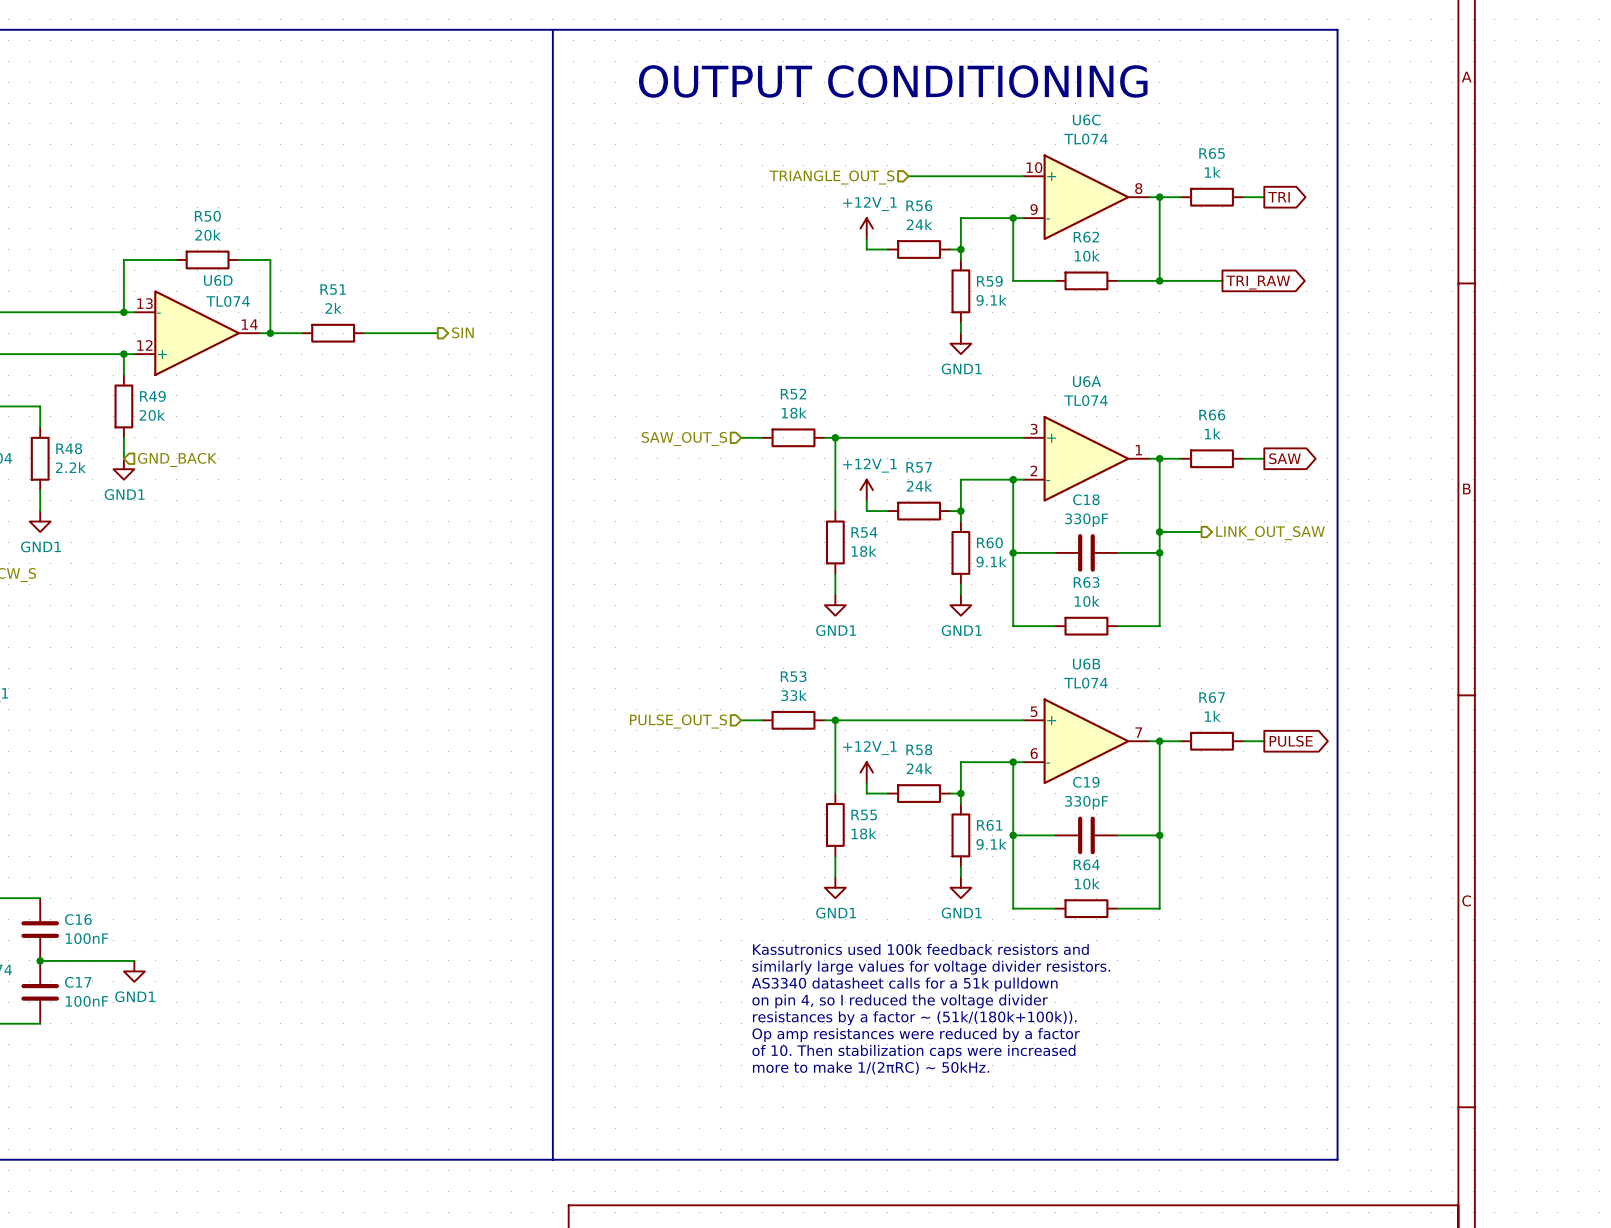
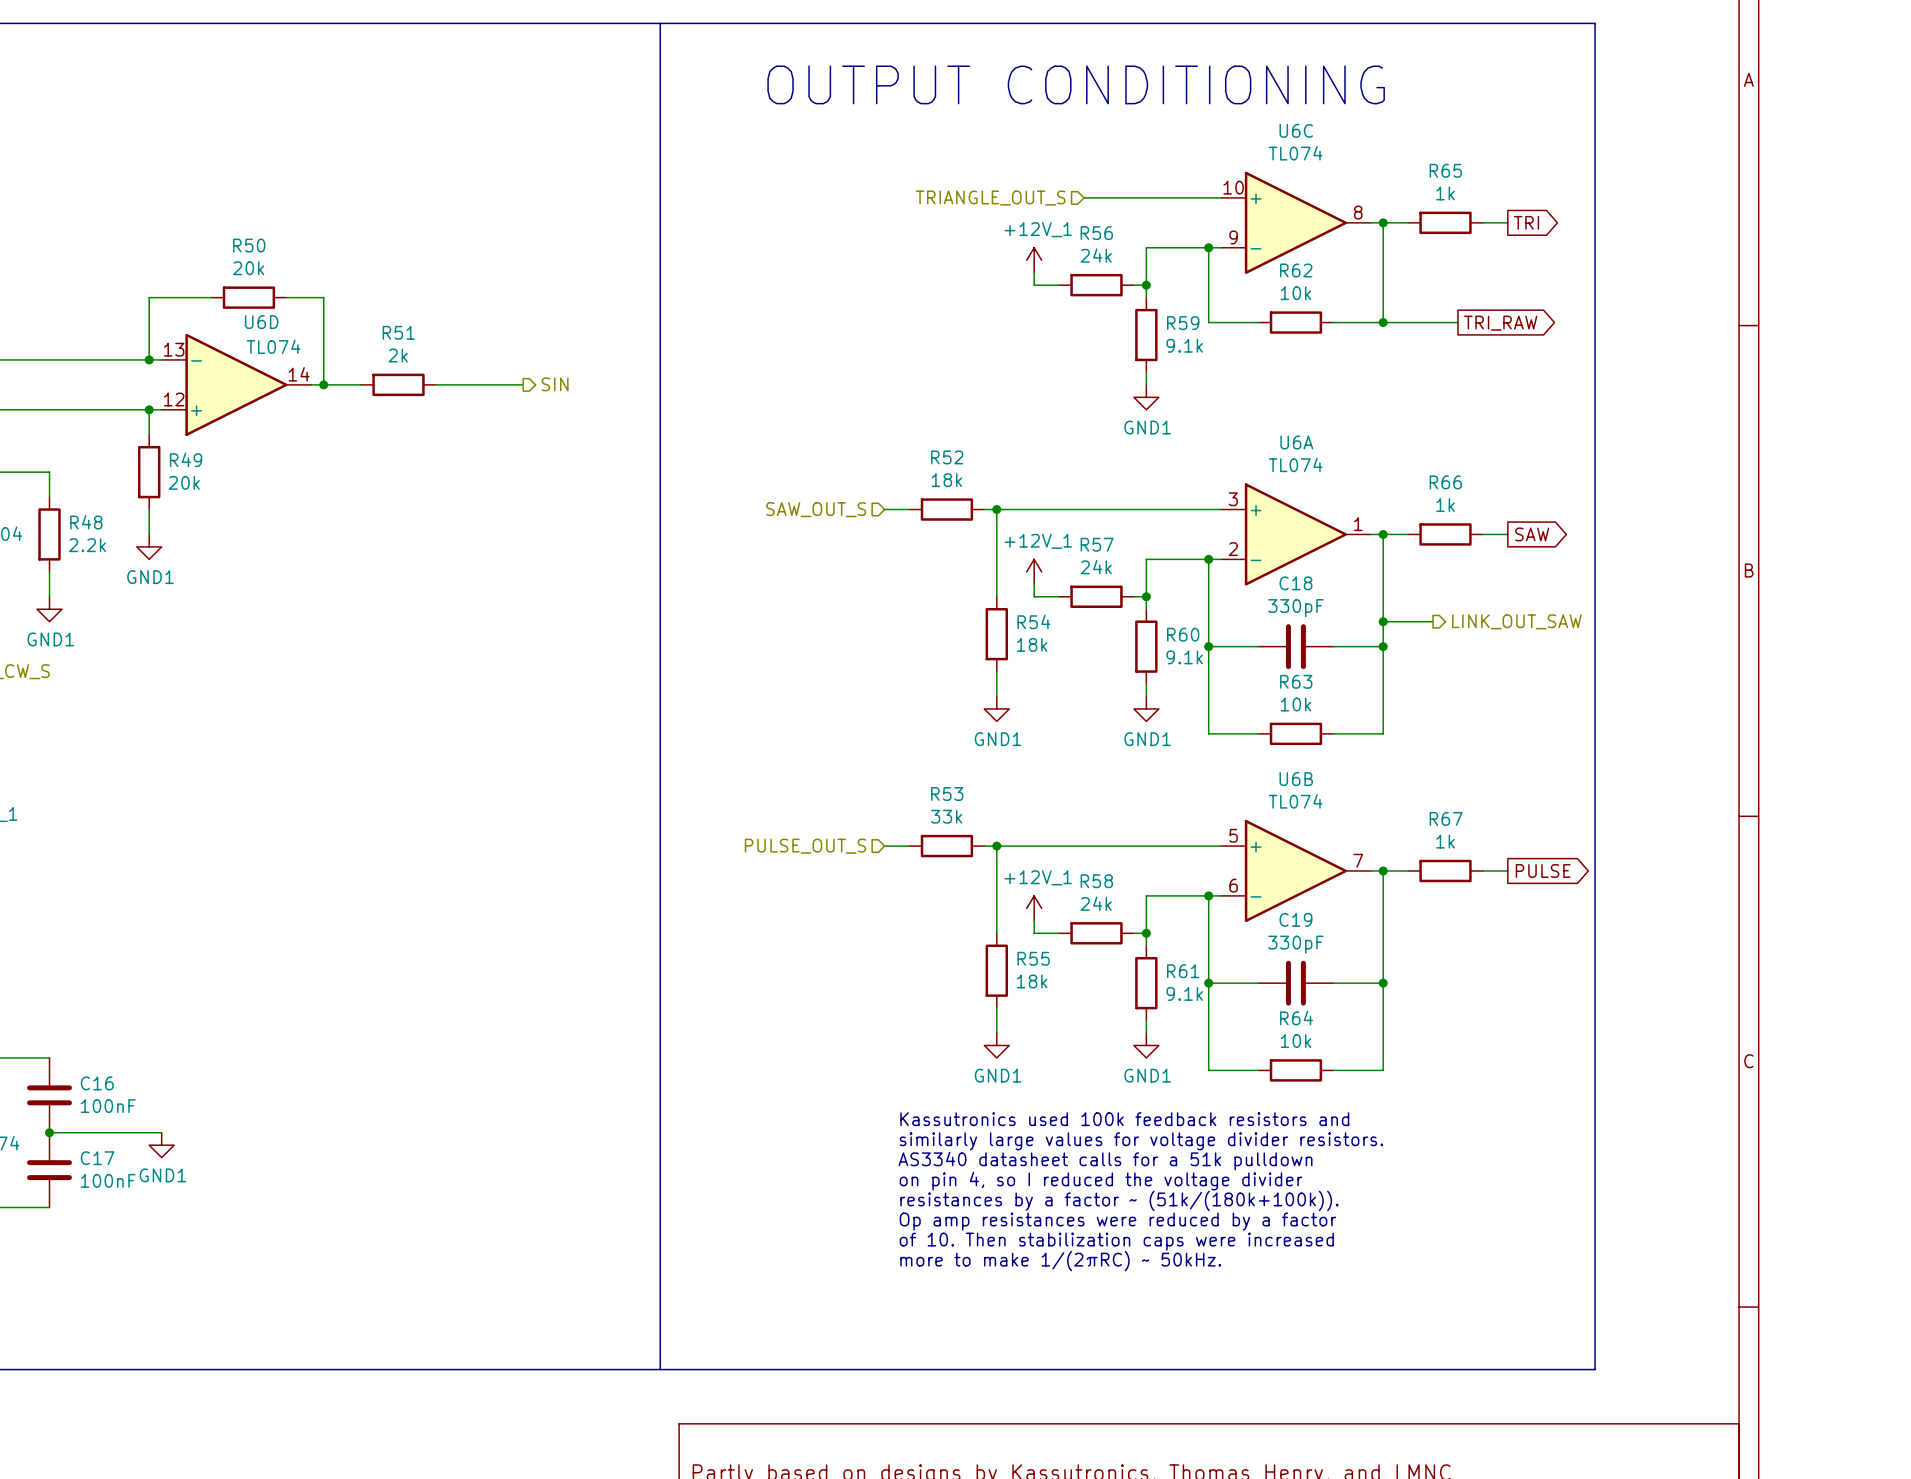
hierarchical label: GND_BACK (177, 459) -> none

